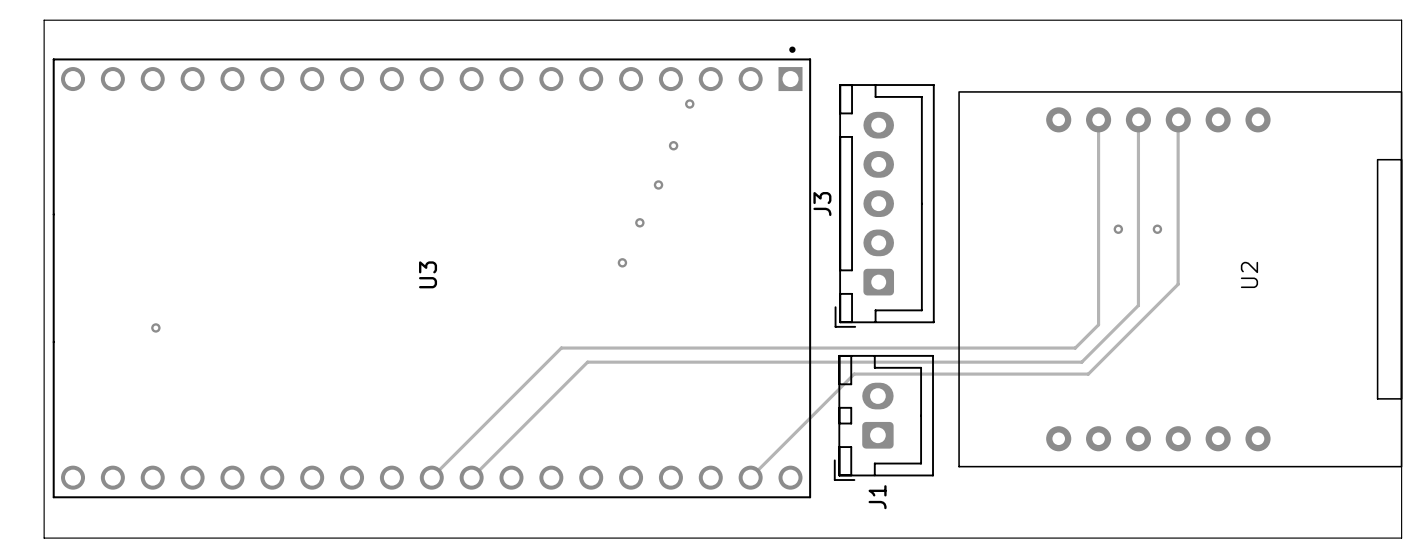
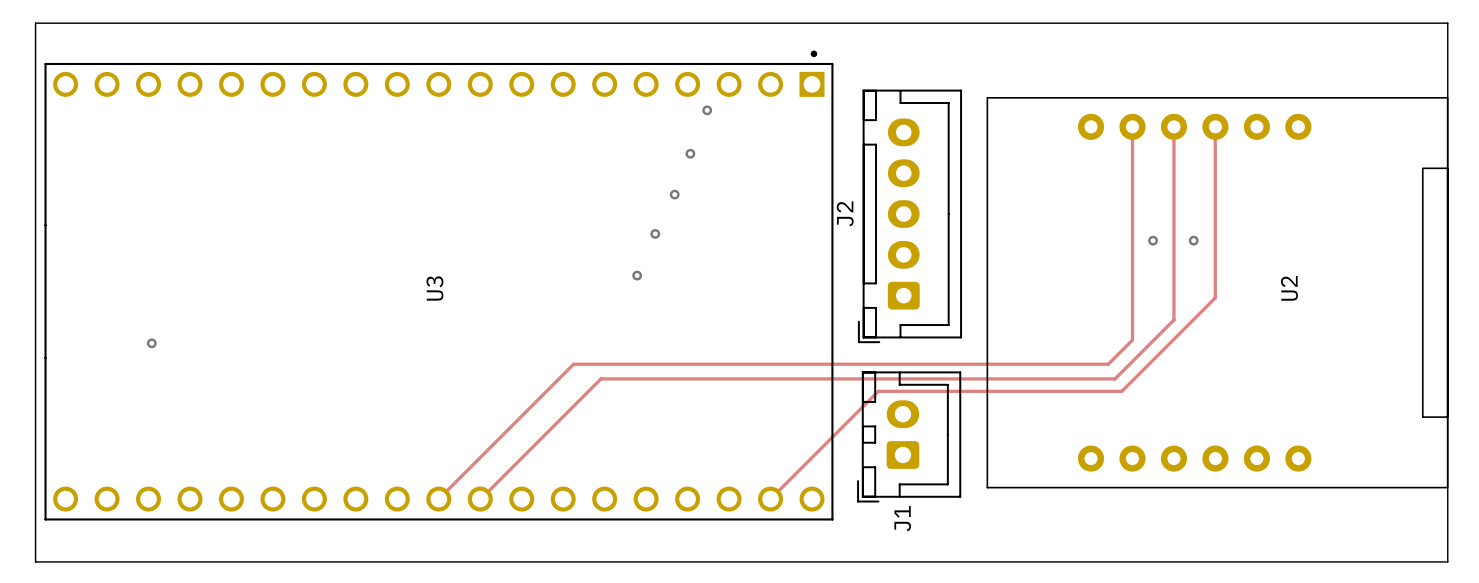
J3 name: J3 (822, 204) -> J2 (845, 213)

